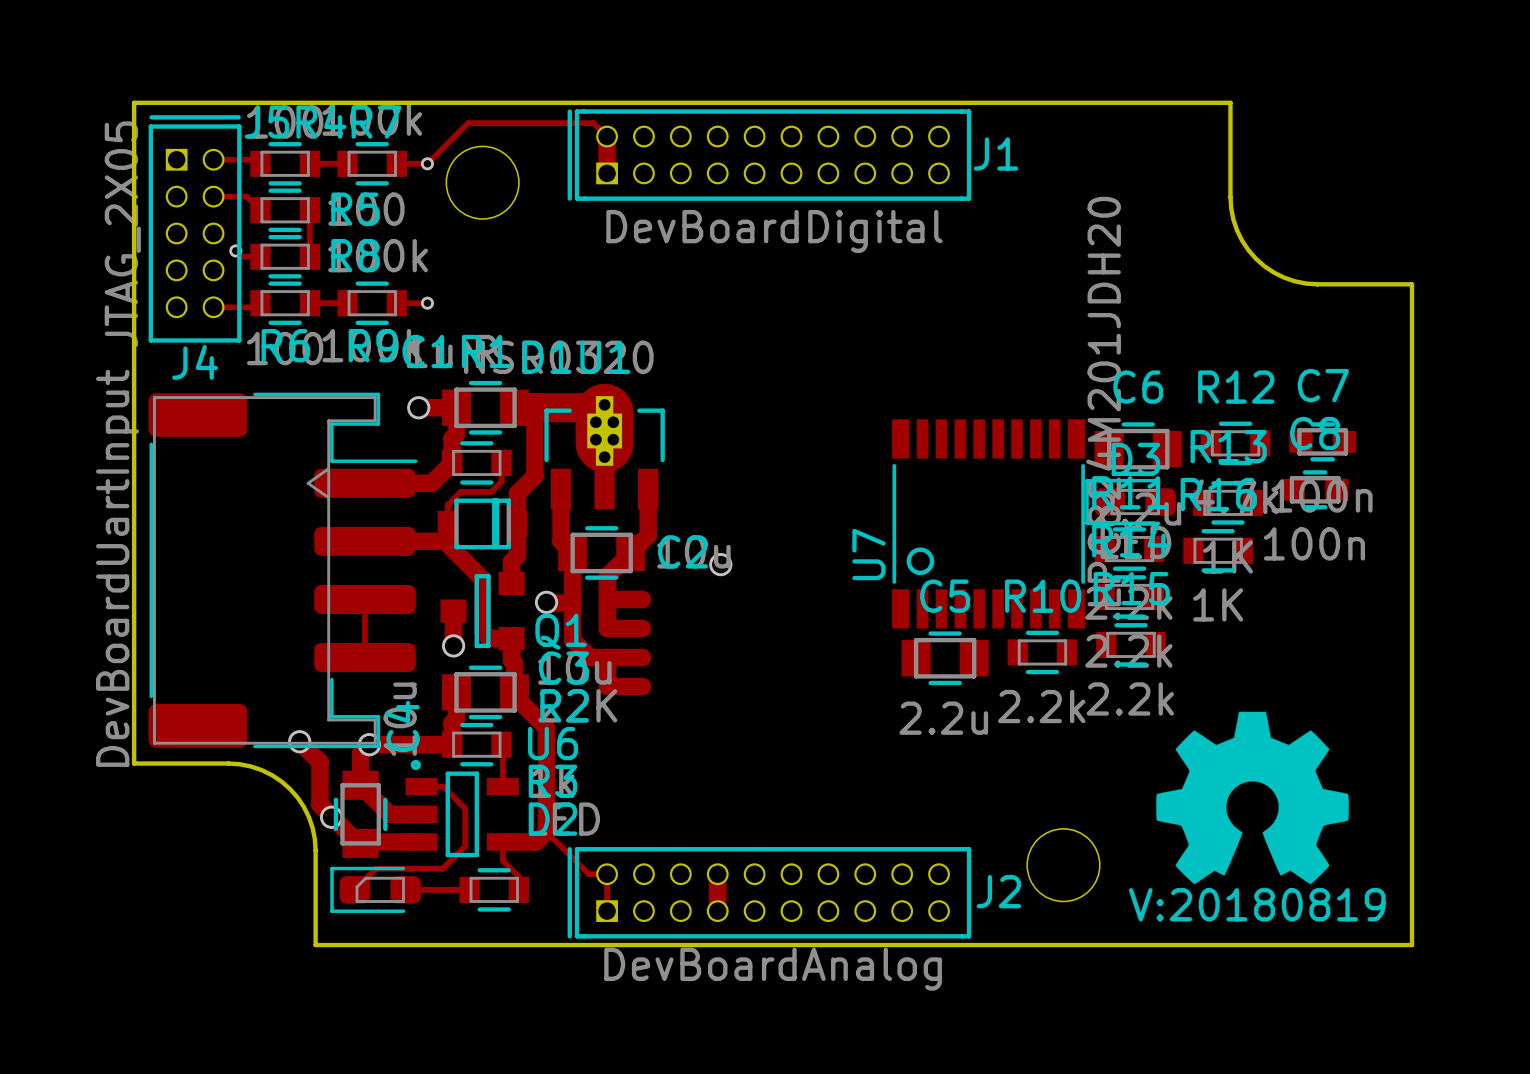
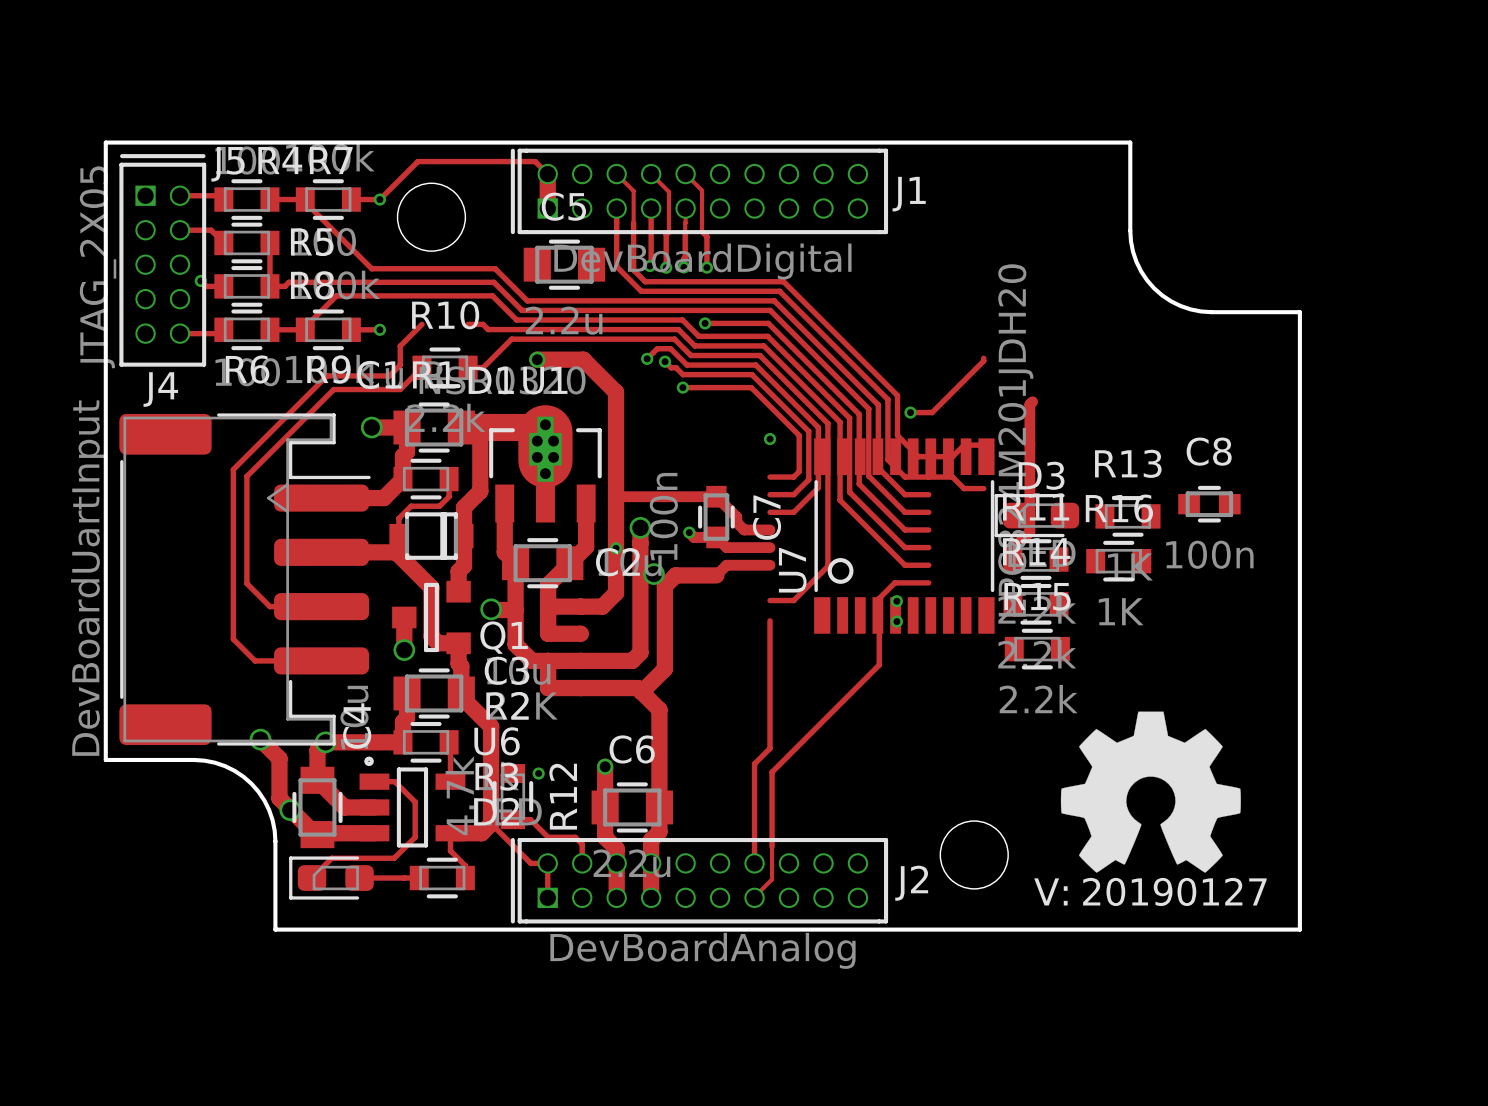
track: none -> (616, 174) (633, 191) (633, 270) (645, 281) (783, 281) (897, 395) (897, 435) (918, 456) (952, 456) (964, 445) (983, 445)
track: none -> (651, 174) (668, 191) (666, 267)
track: none -> (685, 174) (702, 190) (702, 231) (706, 236) (706, 267)
track: none -> (305, 199) (305, 202) (371, 268) (495, 268) (527, 300) (774, 300) (878, 404) (878, 468) (905, 494) (928, 494)
track: none -> (616, 208) (616, 266) (641, 291) (779, 291) (887, 399) (887, 459) (905, 477) (952, 477) (964, 488) (983, 488)
track: none -> (651, 208) (649, 266)
track: none -> (685, 208) (683, 267)
via: none -> (649, 266)
via: none -> (666, 267)
via: none -> (683, 267)
via: none -> (706, 267)
track: none -> (269, 286) (284, 286) (288, 282) (493, 282) (521, 310) (770, 310) (868, 408) (868, 476) (905, 512) (928, 512)
track: none -> (705, 323) (768, 323) (859, 414) (859, 484) (905, 529) (928, 529)
via: none -> (705, 323)
track: none -> (468, 324) (483, 324) (488, 329) (678, 329) (694, 345) (763, 345) (840, 422) (840, 500) (905, 565) (928, 565)
track: none -> (305, 329) (305, 327) (336, 295) (492, 295) (516, 320) (682, 320) (698, 336) (767, 336) (849, 418) (849, 492) (905, 547) (928, 547)
track: none -> (983, 358) (983, 361) (932, 412) (910, 412)
track: none -> (647, 358) (657, 348) (670, 348) (686, 365) (755, 365) (818, 427) (818, 487) (793, 512) (770, 512)
via: none -> (647, 358)
track: none -> (537, 359) (583, 359) (616, 392) (616, 593) (602, 606) (580, 606)
via: none -> (537, 359)
track: none -> (665, 361) (671, 367) (676, 367) (683, 374) (751, 374) (808, 431) (808, 479) (793, 494) (770, 494)
via: none -> (665, 361)
track: none -> (421, 367) (400, 389) (333, 389) (246, 476) (246, 583) (269, 606) (321, 606)
track: none -> (468, 367) (483, 367) (511, 339) (674, 339) (690, 355) (759, 355) (827, 423) (827, 566) (793, 600) (770, 600)
track: none -> (682, 387) (751, 387) (799, 435) (799, 471) (793, 477) (770, 477)
via: none -> (682, 387)
track: none -> (1032, 401) (1029, 404) (1029, 532) (1013, 548)
via: none -> (910, 412)
via: none -> (770, 439)
C7 rotation: 0° (1322, 441) -> 90° clockwise (716, 517)
C7 position: (1322, 441) -> (716, 517)
R12 rotation: 0° (1235, 443) -> 90° clockwise (512, 796)
R12 position: (1235, 443) -> (512, 796)
C6 position: (1138, 449) -> (632, 807)
track: none -> (616, 496) (716, 496) (736, 517) (736, 522) (744, 529) (770, 529)
track: none -> (640, 527) (640, 652) (632, 660) (580, 660)
via: none -> (640, 527)
track: none -> (689, 532) (694, 537) (716, 537) (726, 547) (770, 547)
via: none -> (689, 532)
via: none -> (616, 548)
track: none -> (770, 565) (726, 565) (716, 575) (675, 575) (664, 586) (664, 669) (641, 692)
track: none -> (928, 582) (894, 582) (879, 598) (879, 664) (772, 772) (772, 879) (754, 896) (757, 897)
via: none -> (896, 601)
track: (365, 599) (365, 657) -> (421, 324) (400, 346) (400, 365) (389, 375) (326, 375) (233, 469) (233, 639) (255, 660) (321, 660)
track: none -> (770, 620) (770, 748) (754, 763) (754, 863)
via: none -> (896, 621)
R10 position: (1042, 652) -> (445, 367)
C5 position: (945, 658) -> (564, 264)
track: none -> (580, 688) (637, 688) (659, 709) (659, 831) (651, 840) (651, 863)
track: none -> (605, 766) (605, 837) (616, 849) (616, 897)
via: none -> (605, 766)
via: none -> (538, 773)
track: none -> (512, 819) (530, 819) (548, 837) (575, 837) (582, 844) (582, 863)
drawing shape: [1128, 888, 1386, 922] -> [1034, 877, 1267, 907]

